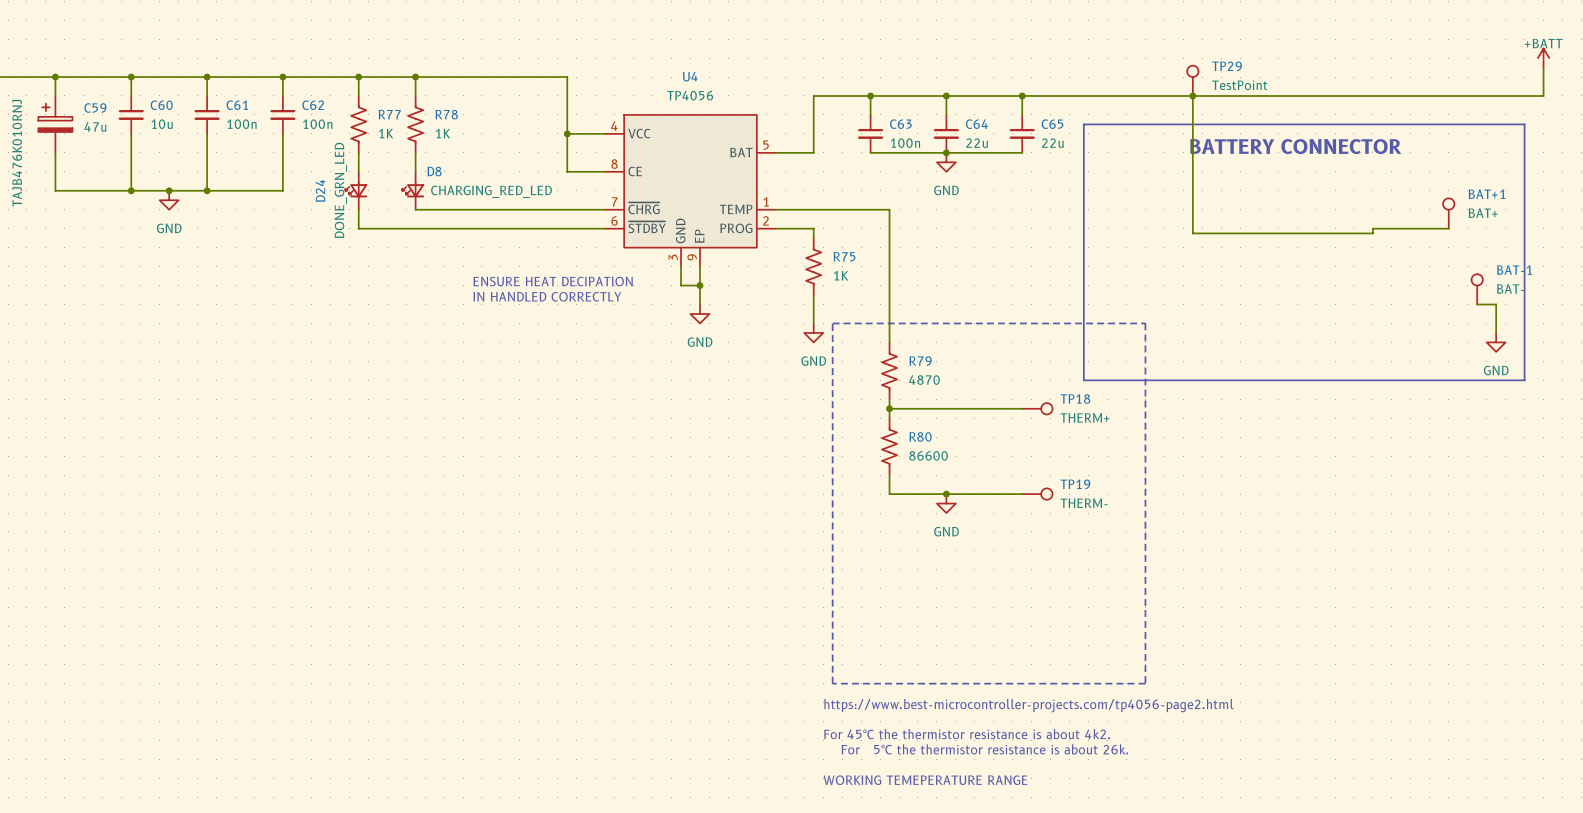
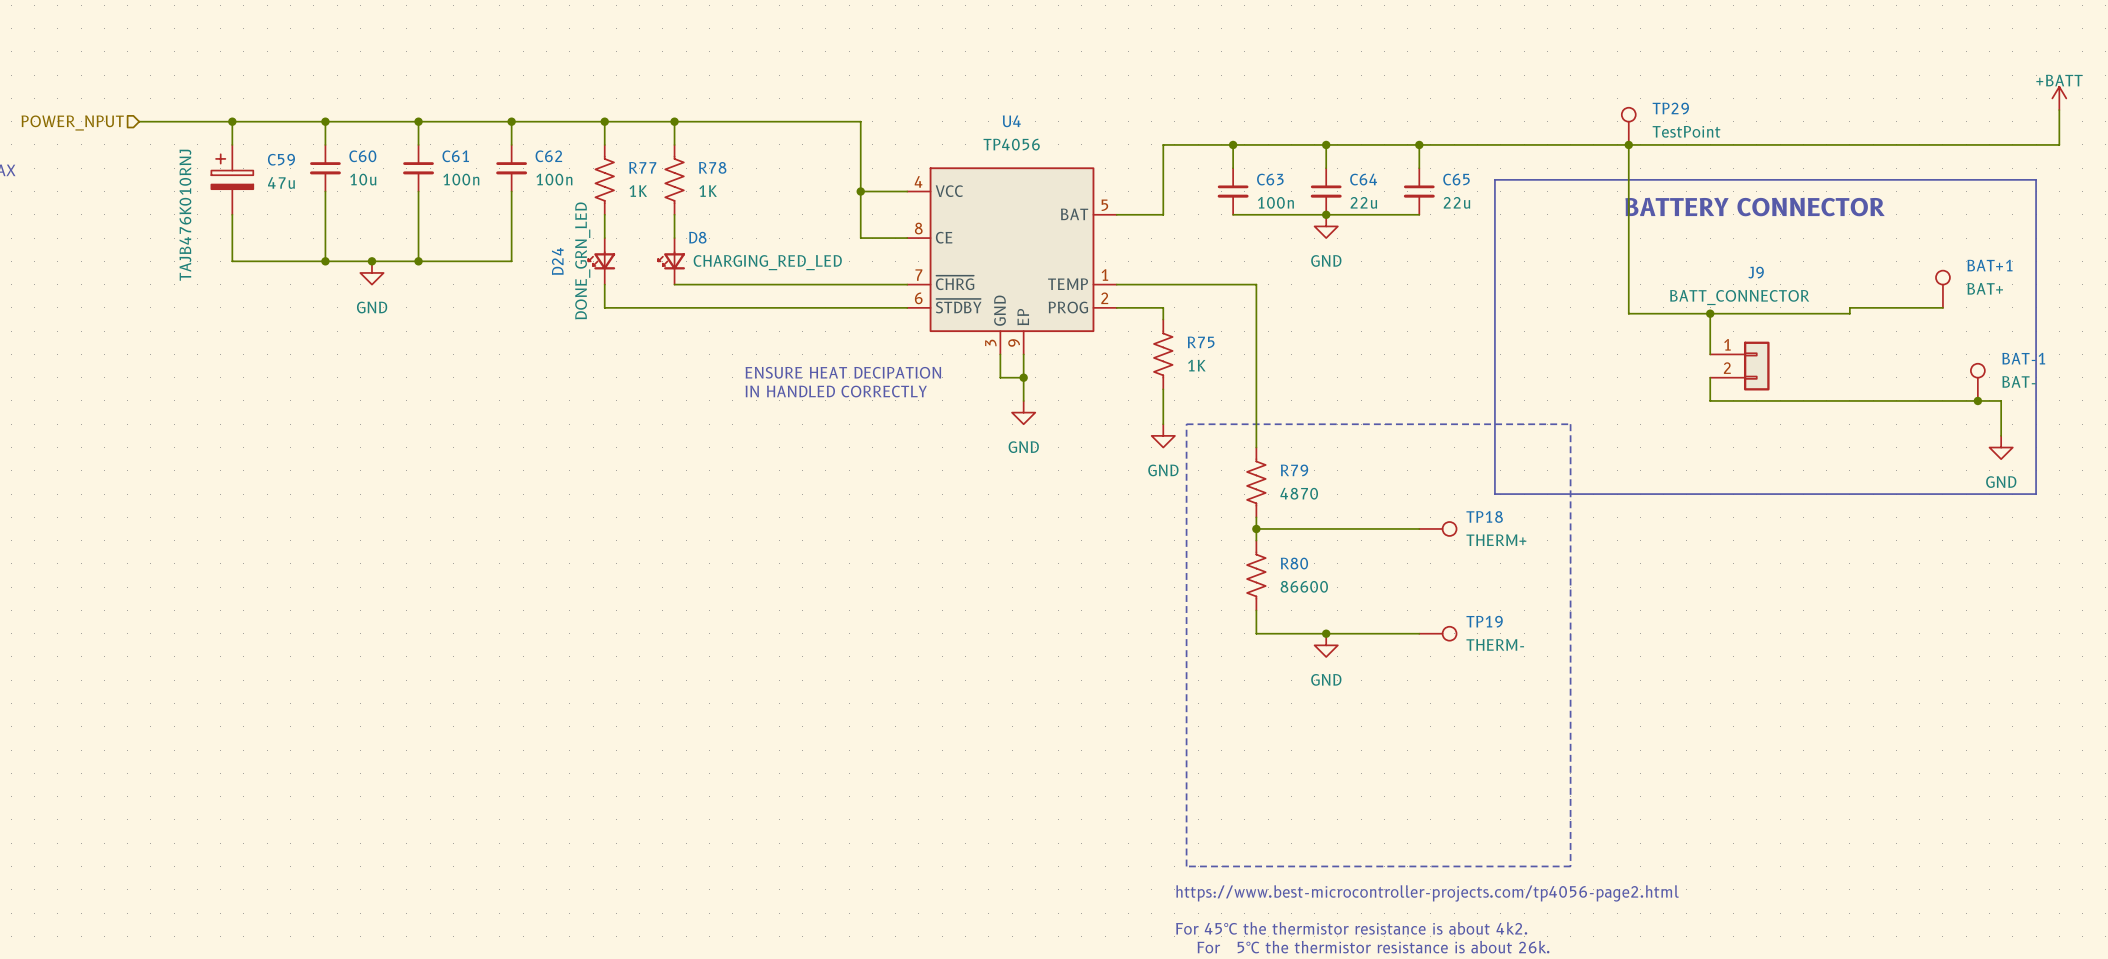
wire: none -> (1710, 313) (1710, 354)
junction: none -> (1710, 313)
J9: none -> BATT_CONNECTOR (1739, 366)
wire: none -> (1710, 377) (1710, 400) (1977, 400)
junction: none -> (1977, 400)

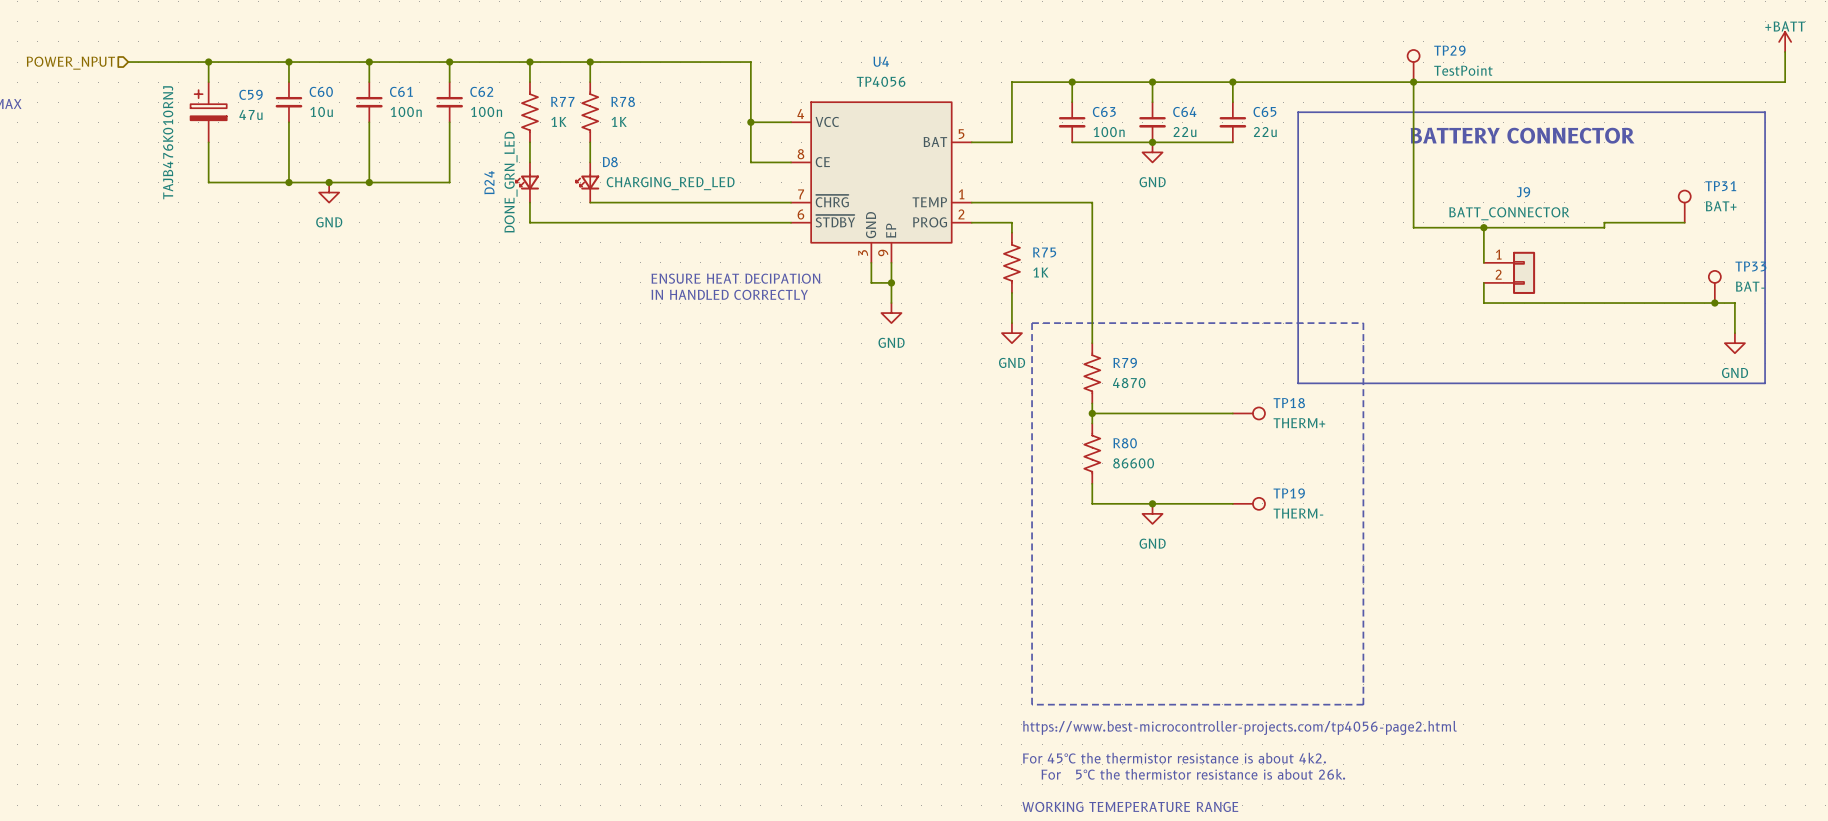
BAT+1 name: BAT+1 (1990, 265) -> TP31 (1720, 186)
BAT-1 name: BAT-1 (2023, 358) -> TP33 (1750, 266)

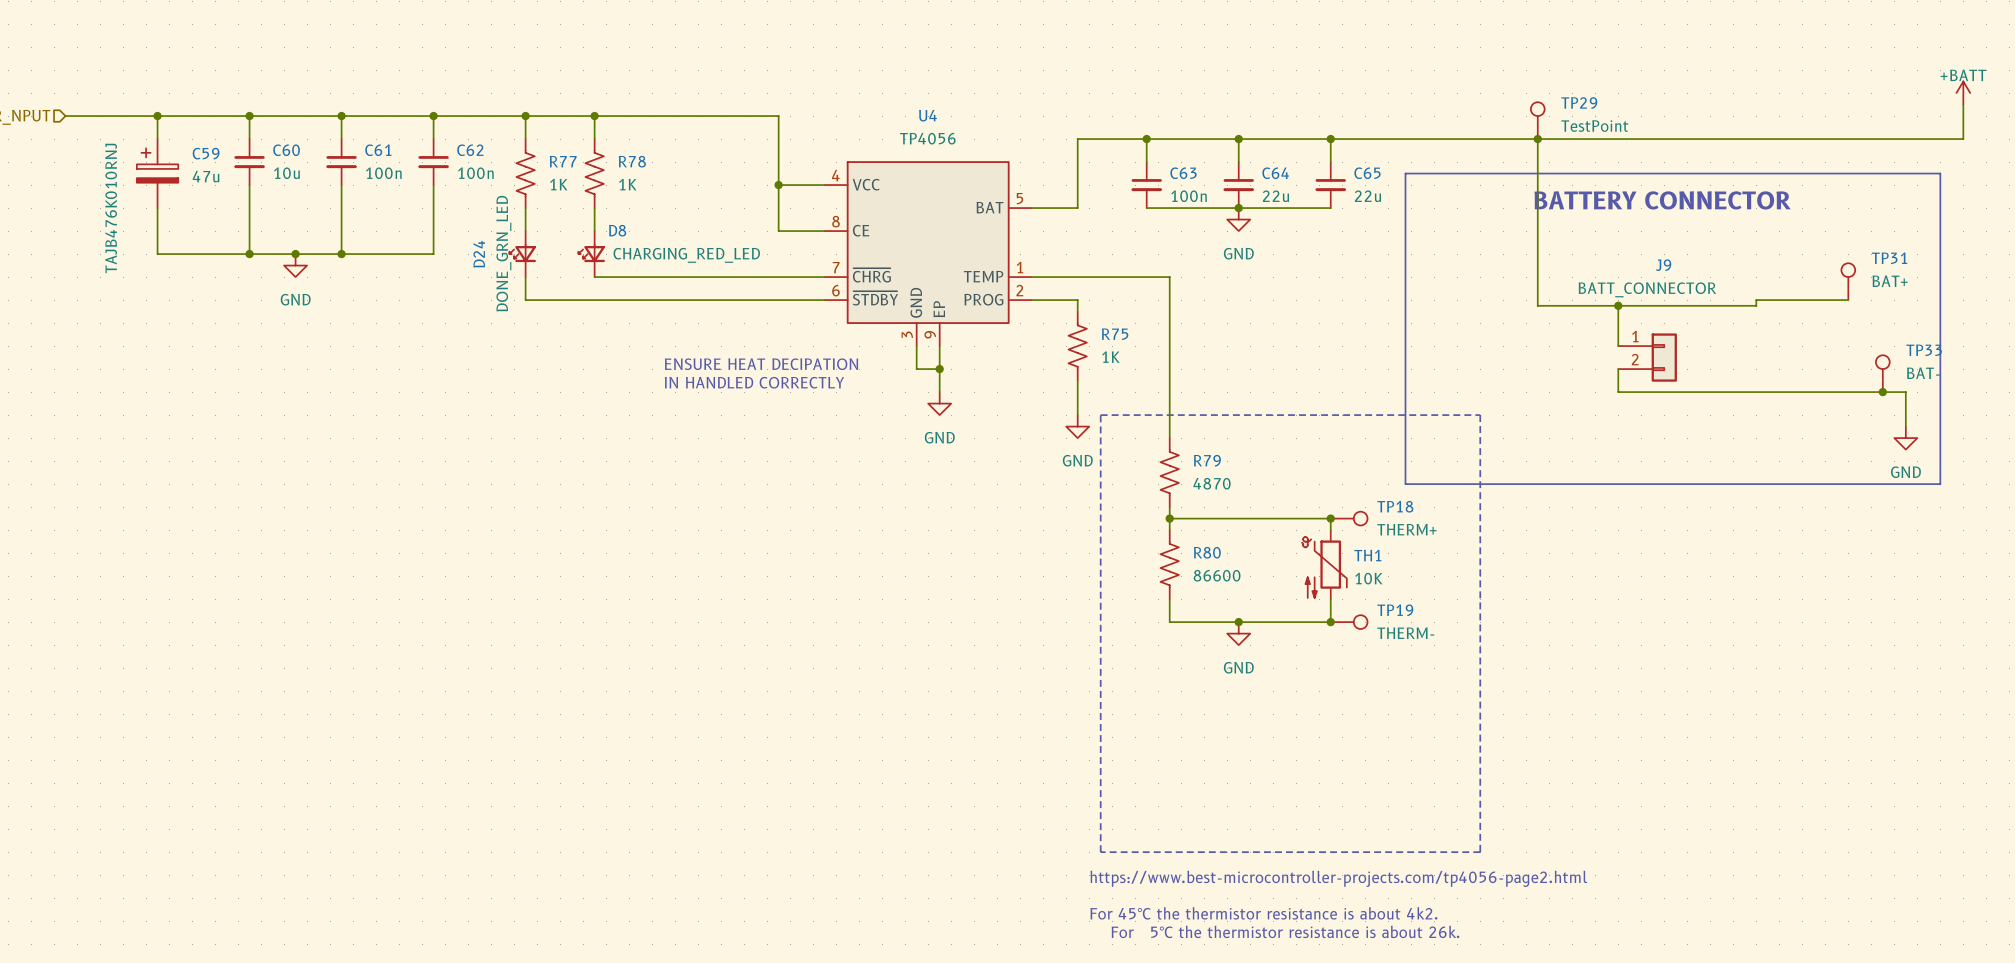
wire: none -> (1330, 518) (1330, 530)
junction: none -> (1330, 518)
TH1: none -> 10K (1324, 564)
wire: none -> (1330, 599) (1330, 622)
junction: none -> (1330, 622)

